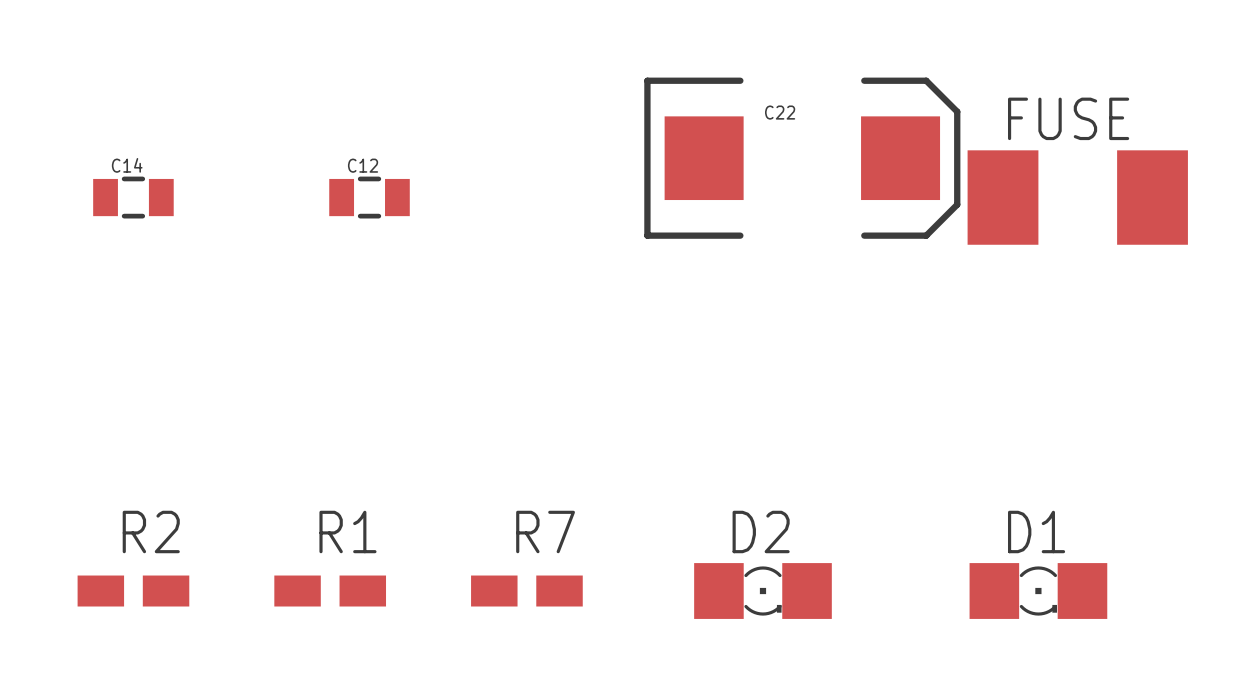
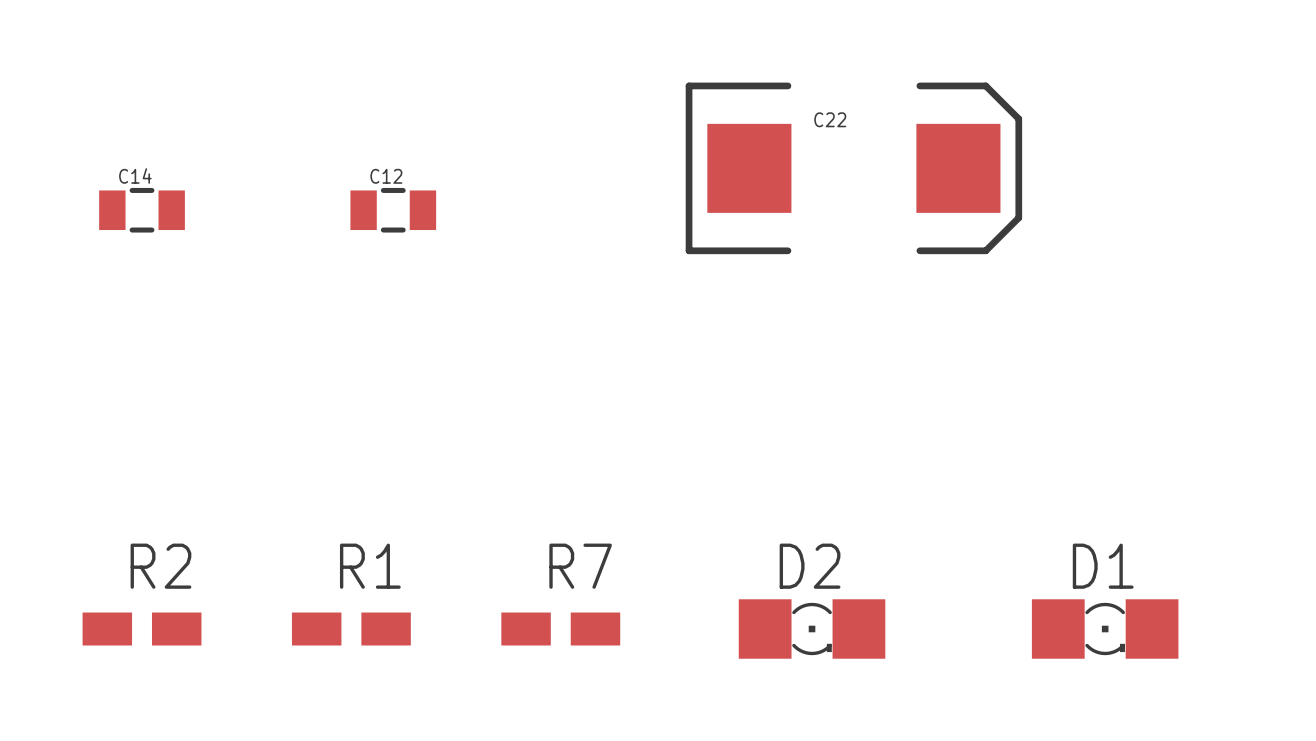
part: (1077, 197) -> none

